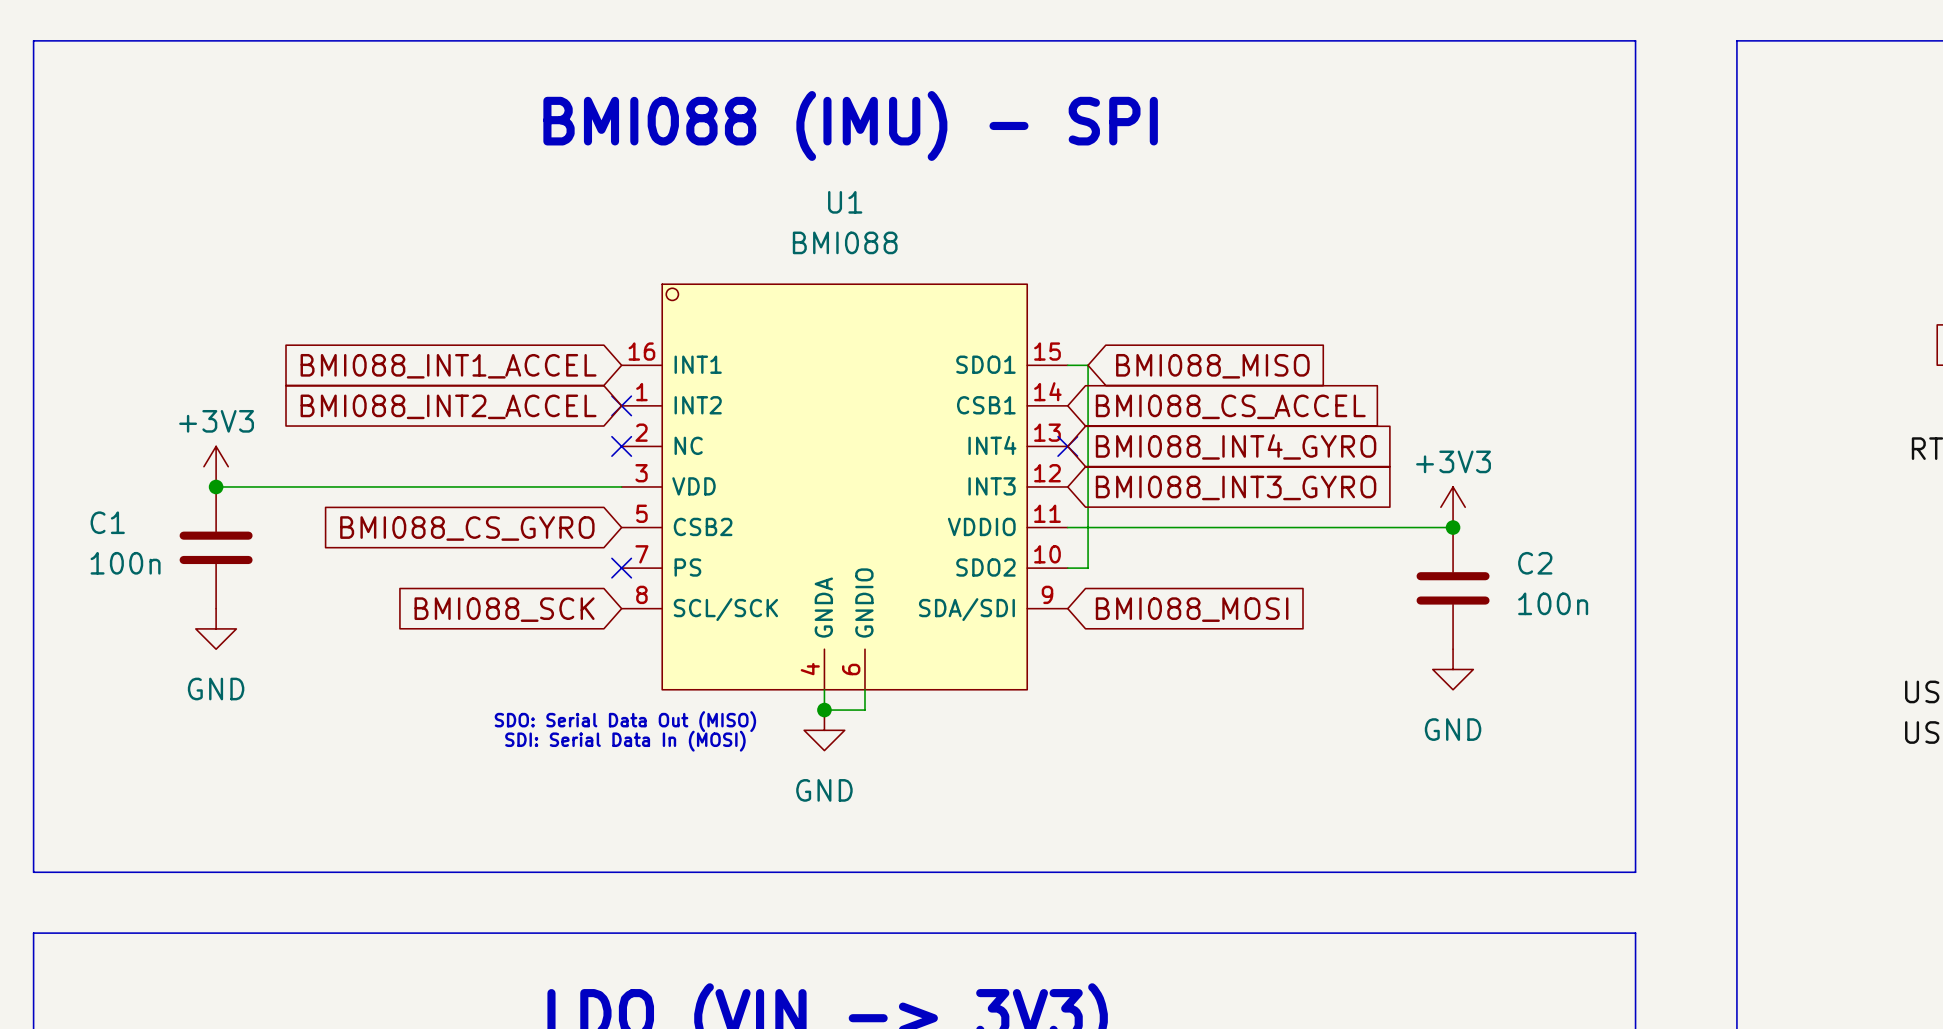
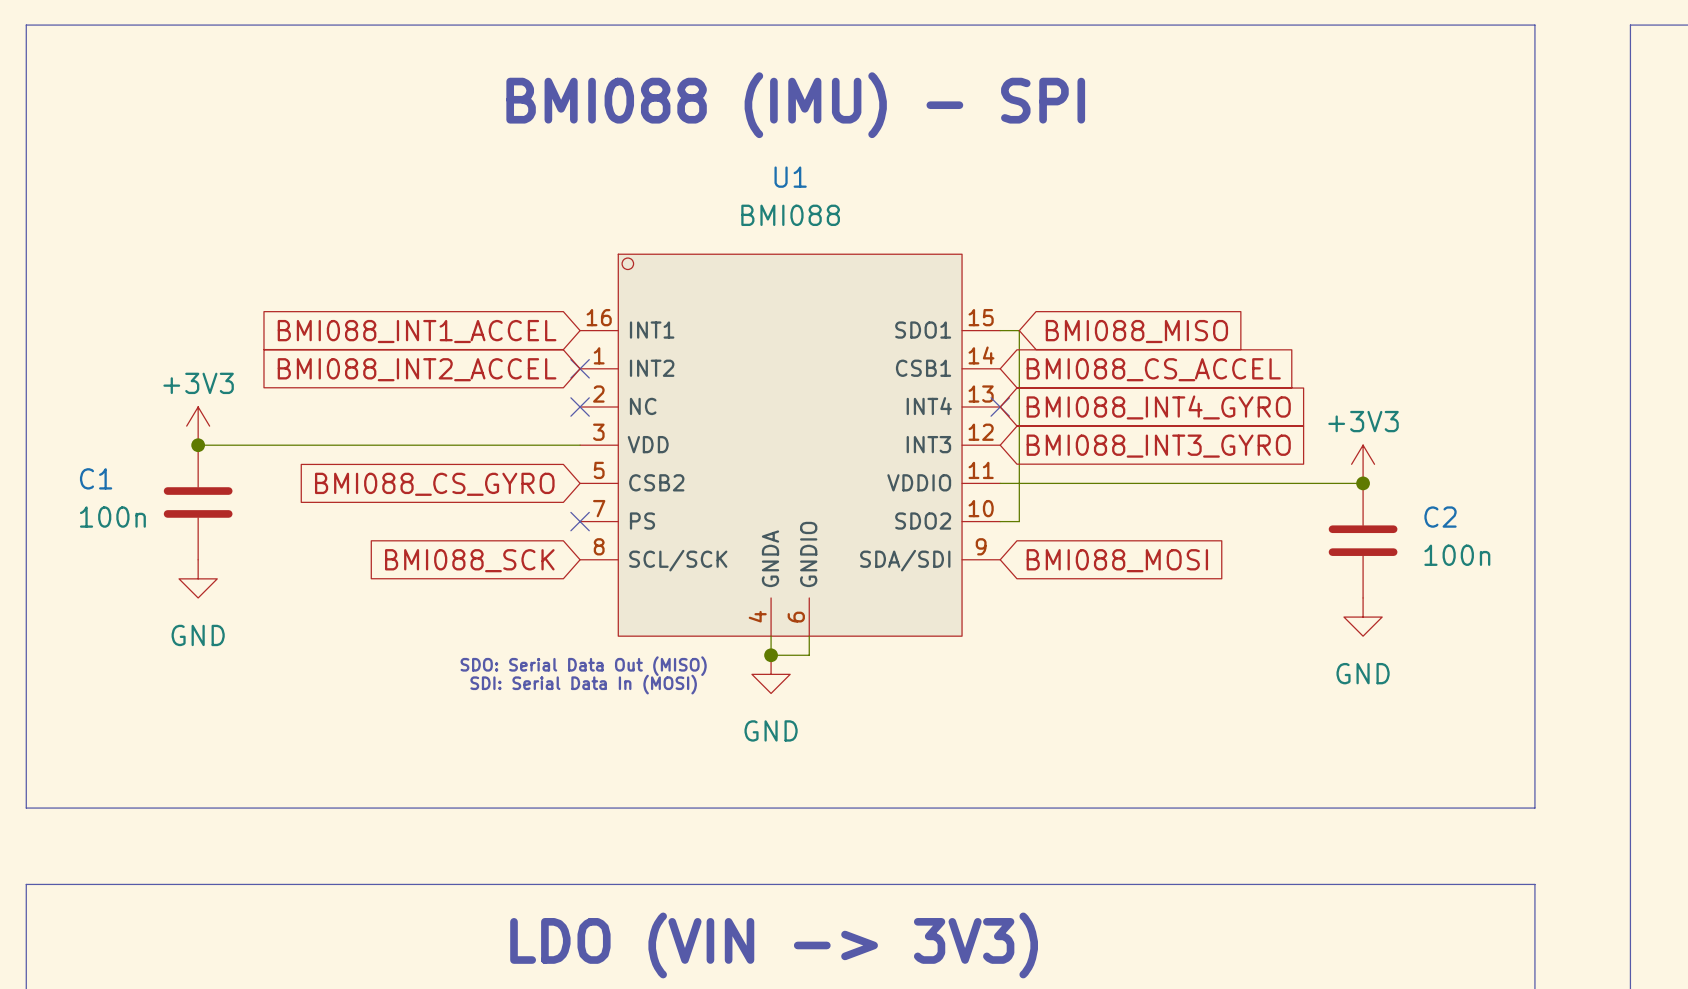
line: (33, 953) (33, 933) (1635, 933) (1635, 953) -> (26, 884) (1534, 884)

